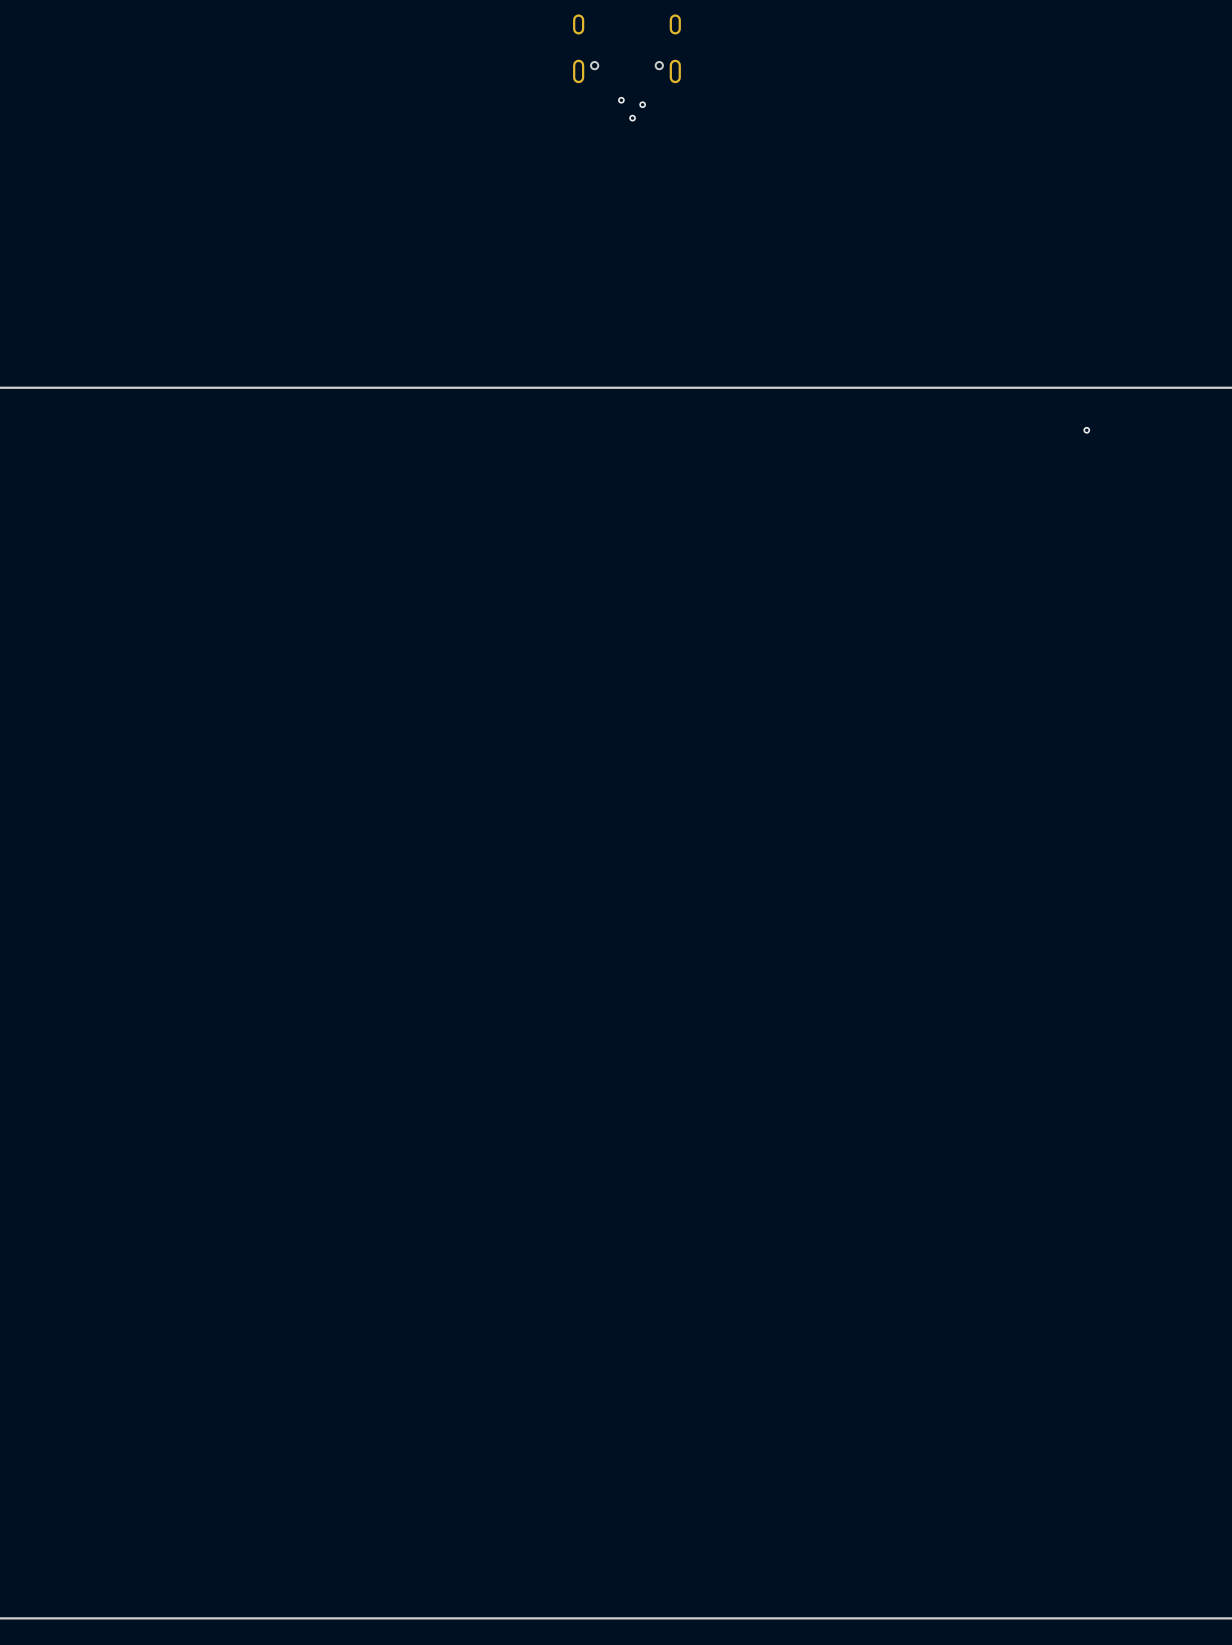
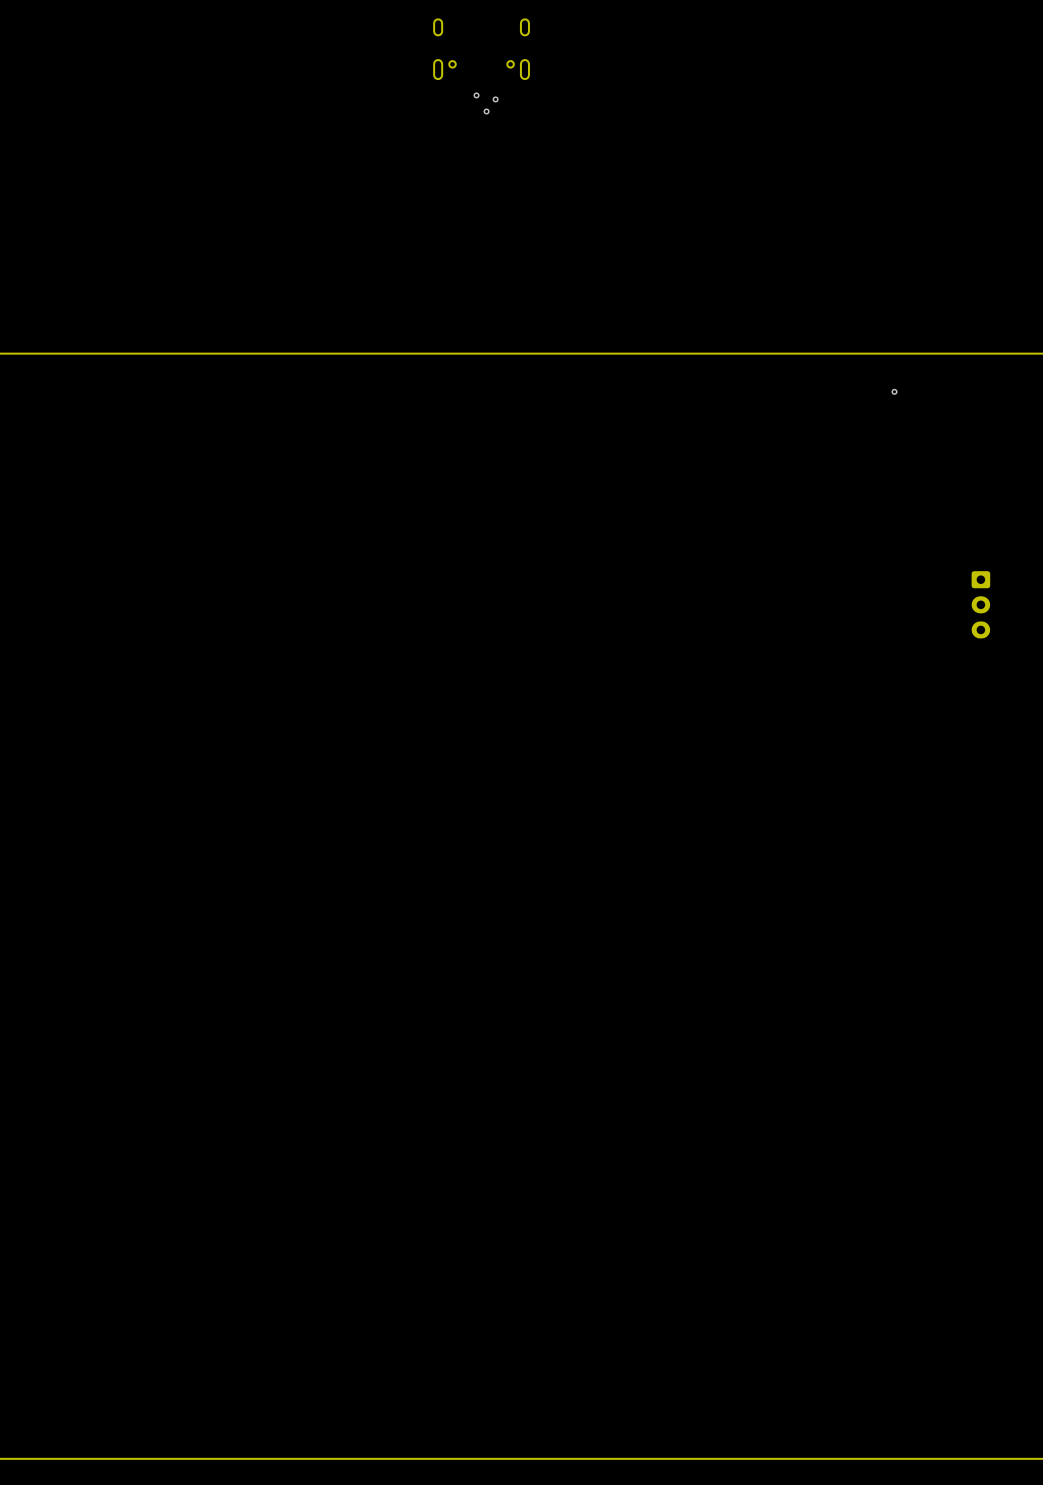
part: none -> (980, 604)

